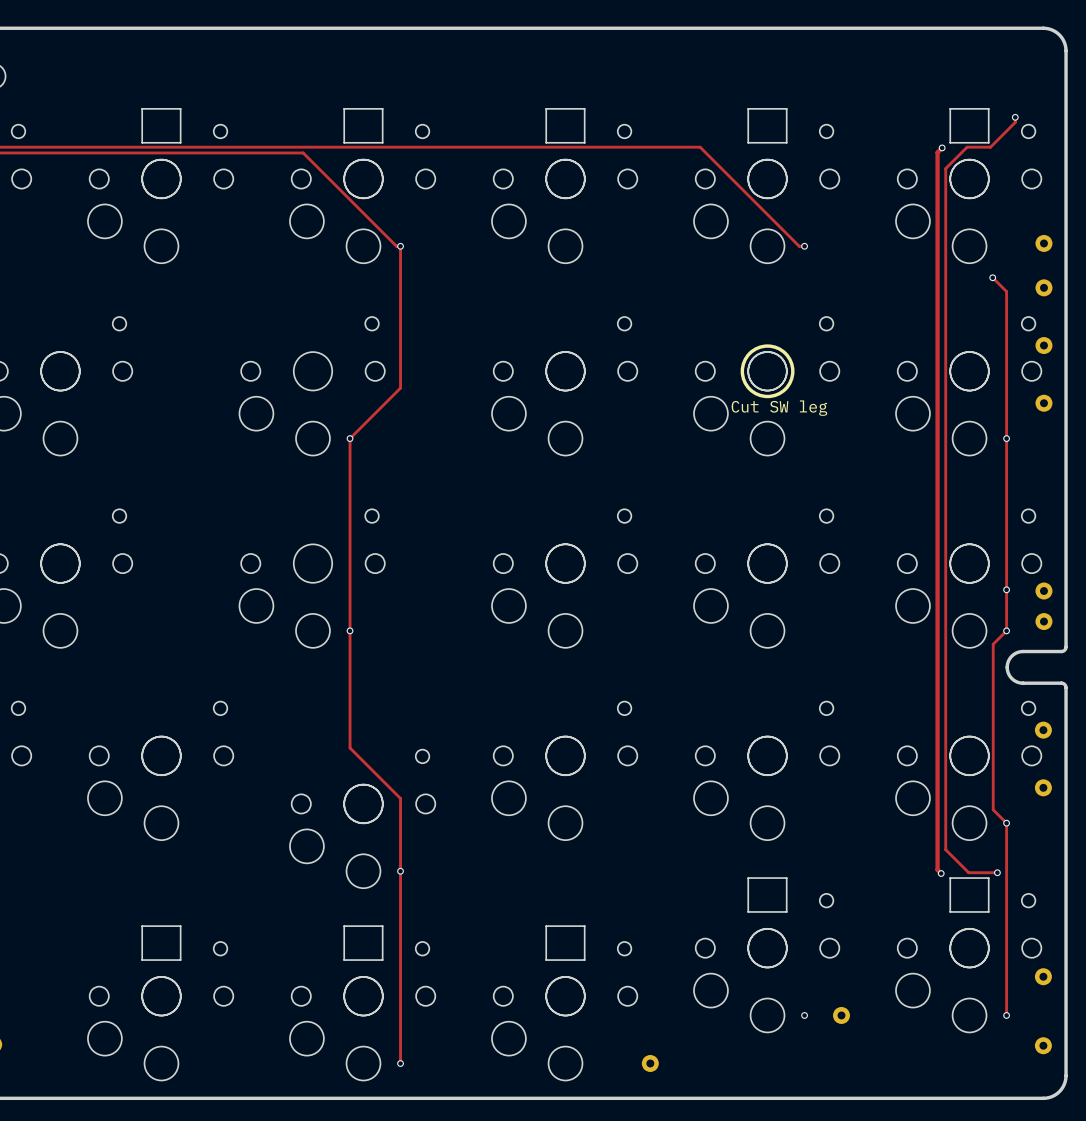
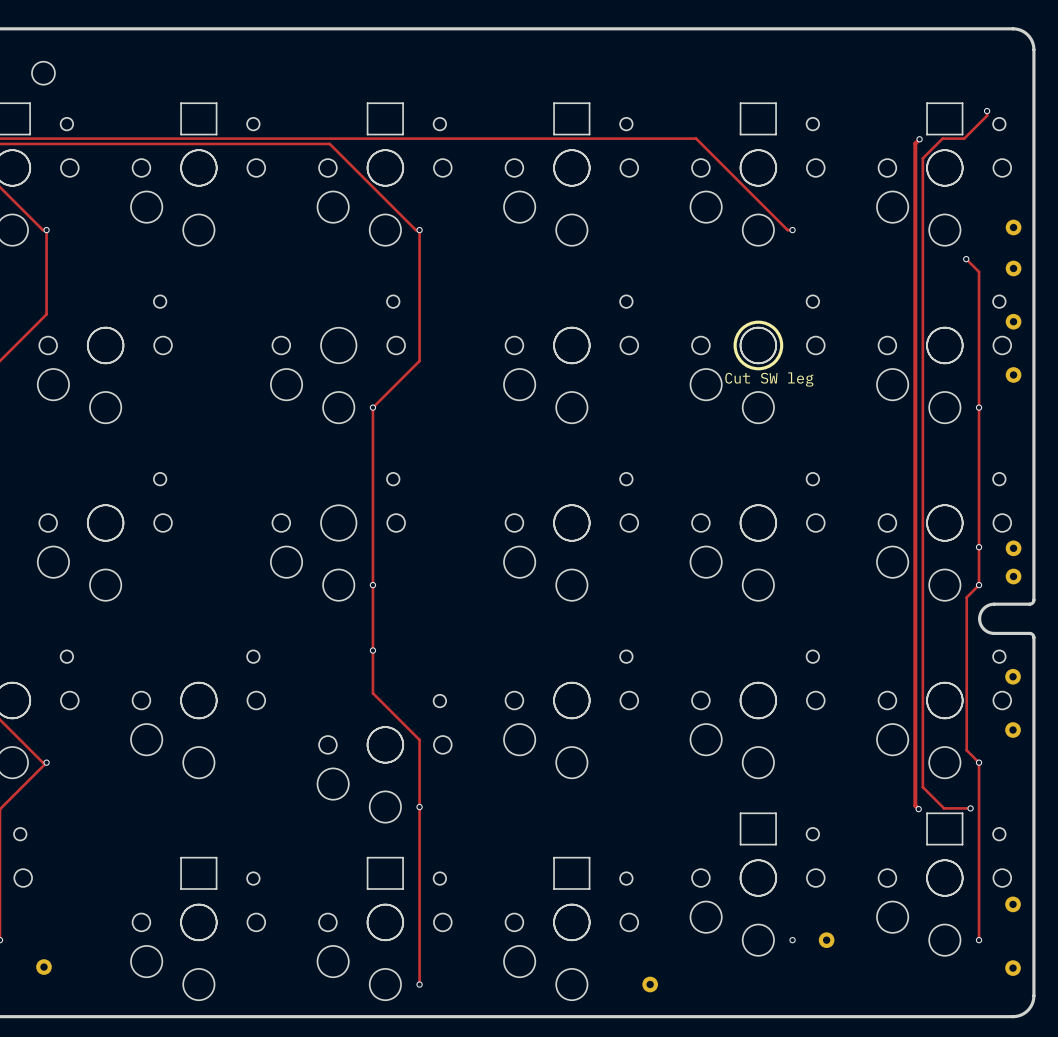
via: none -> (372, 650)

